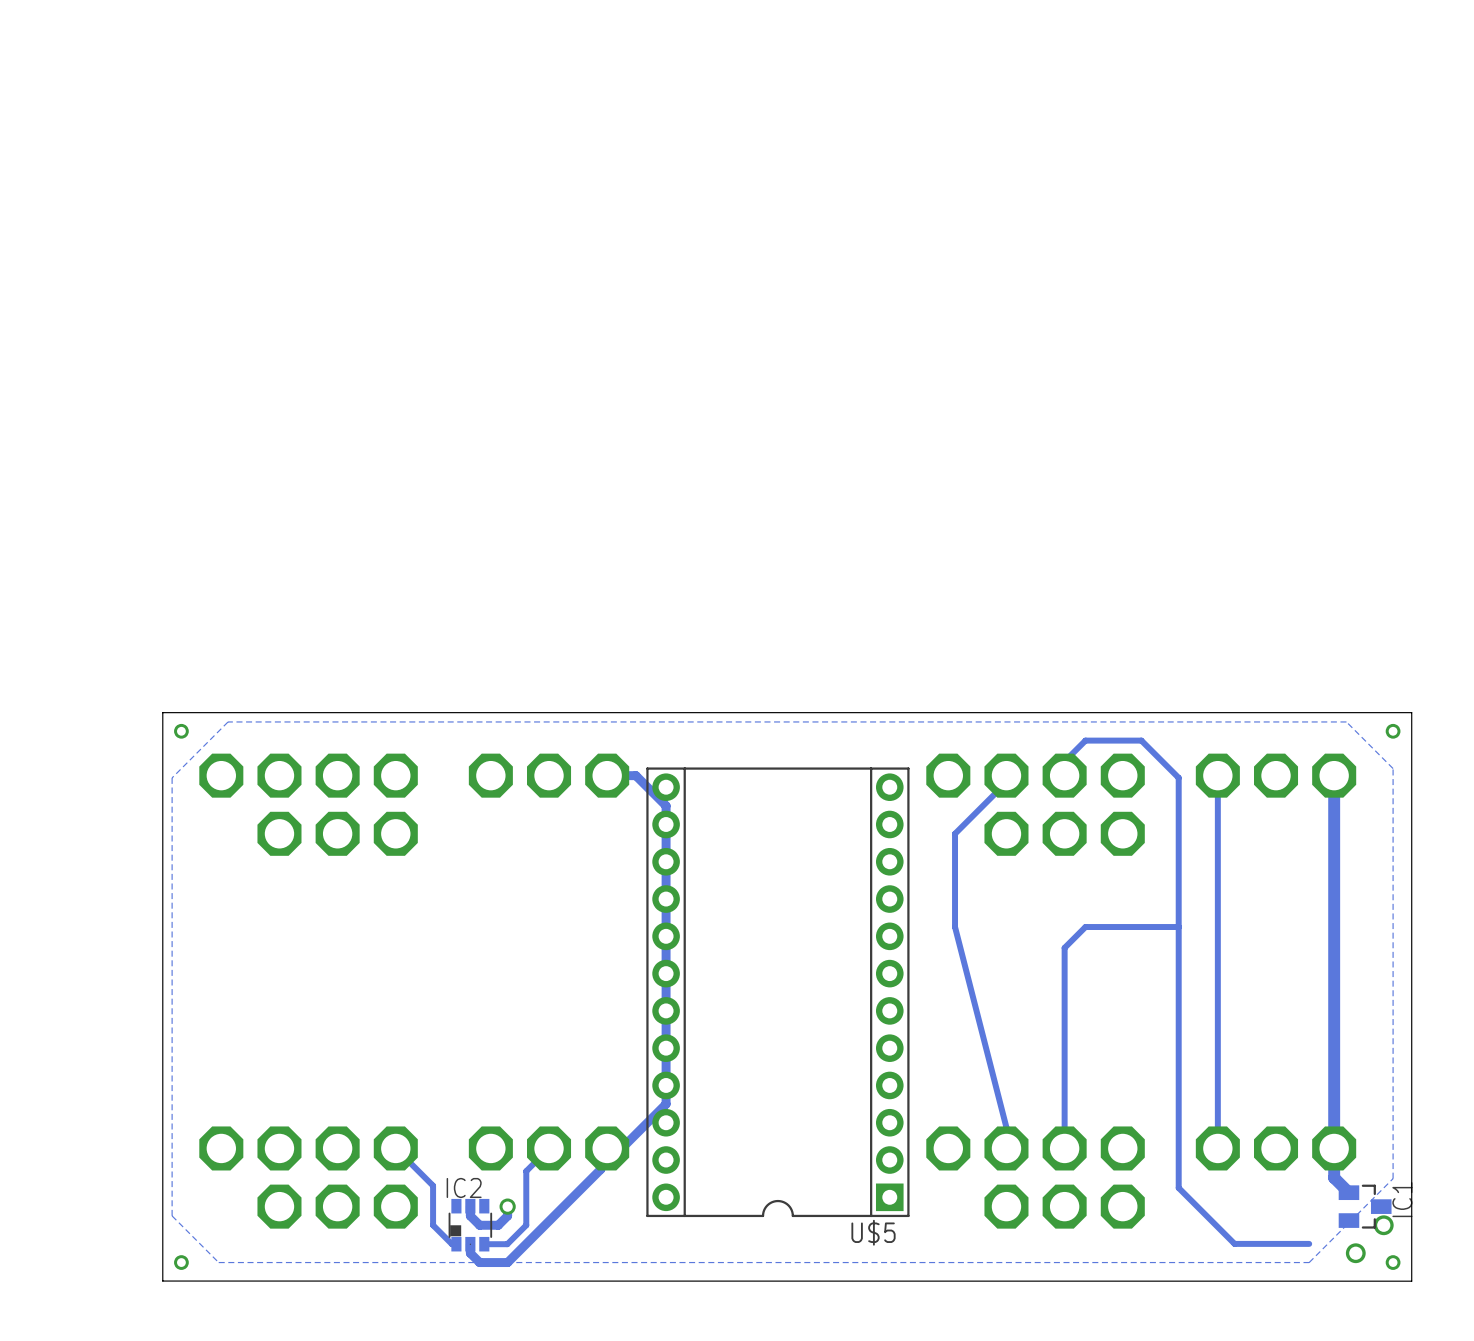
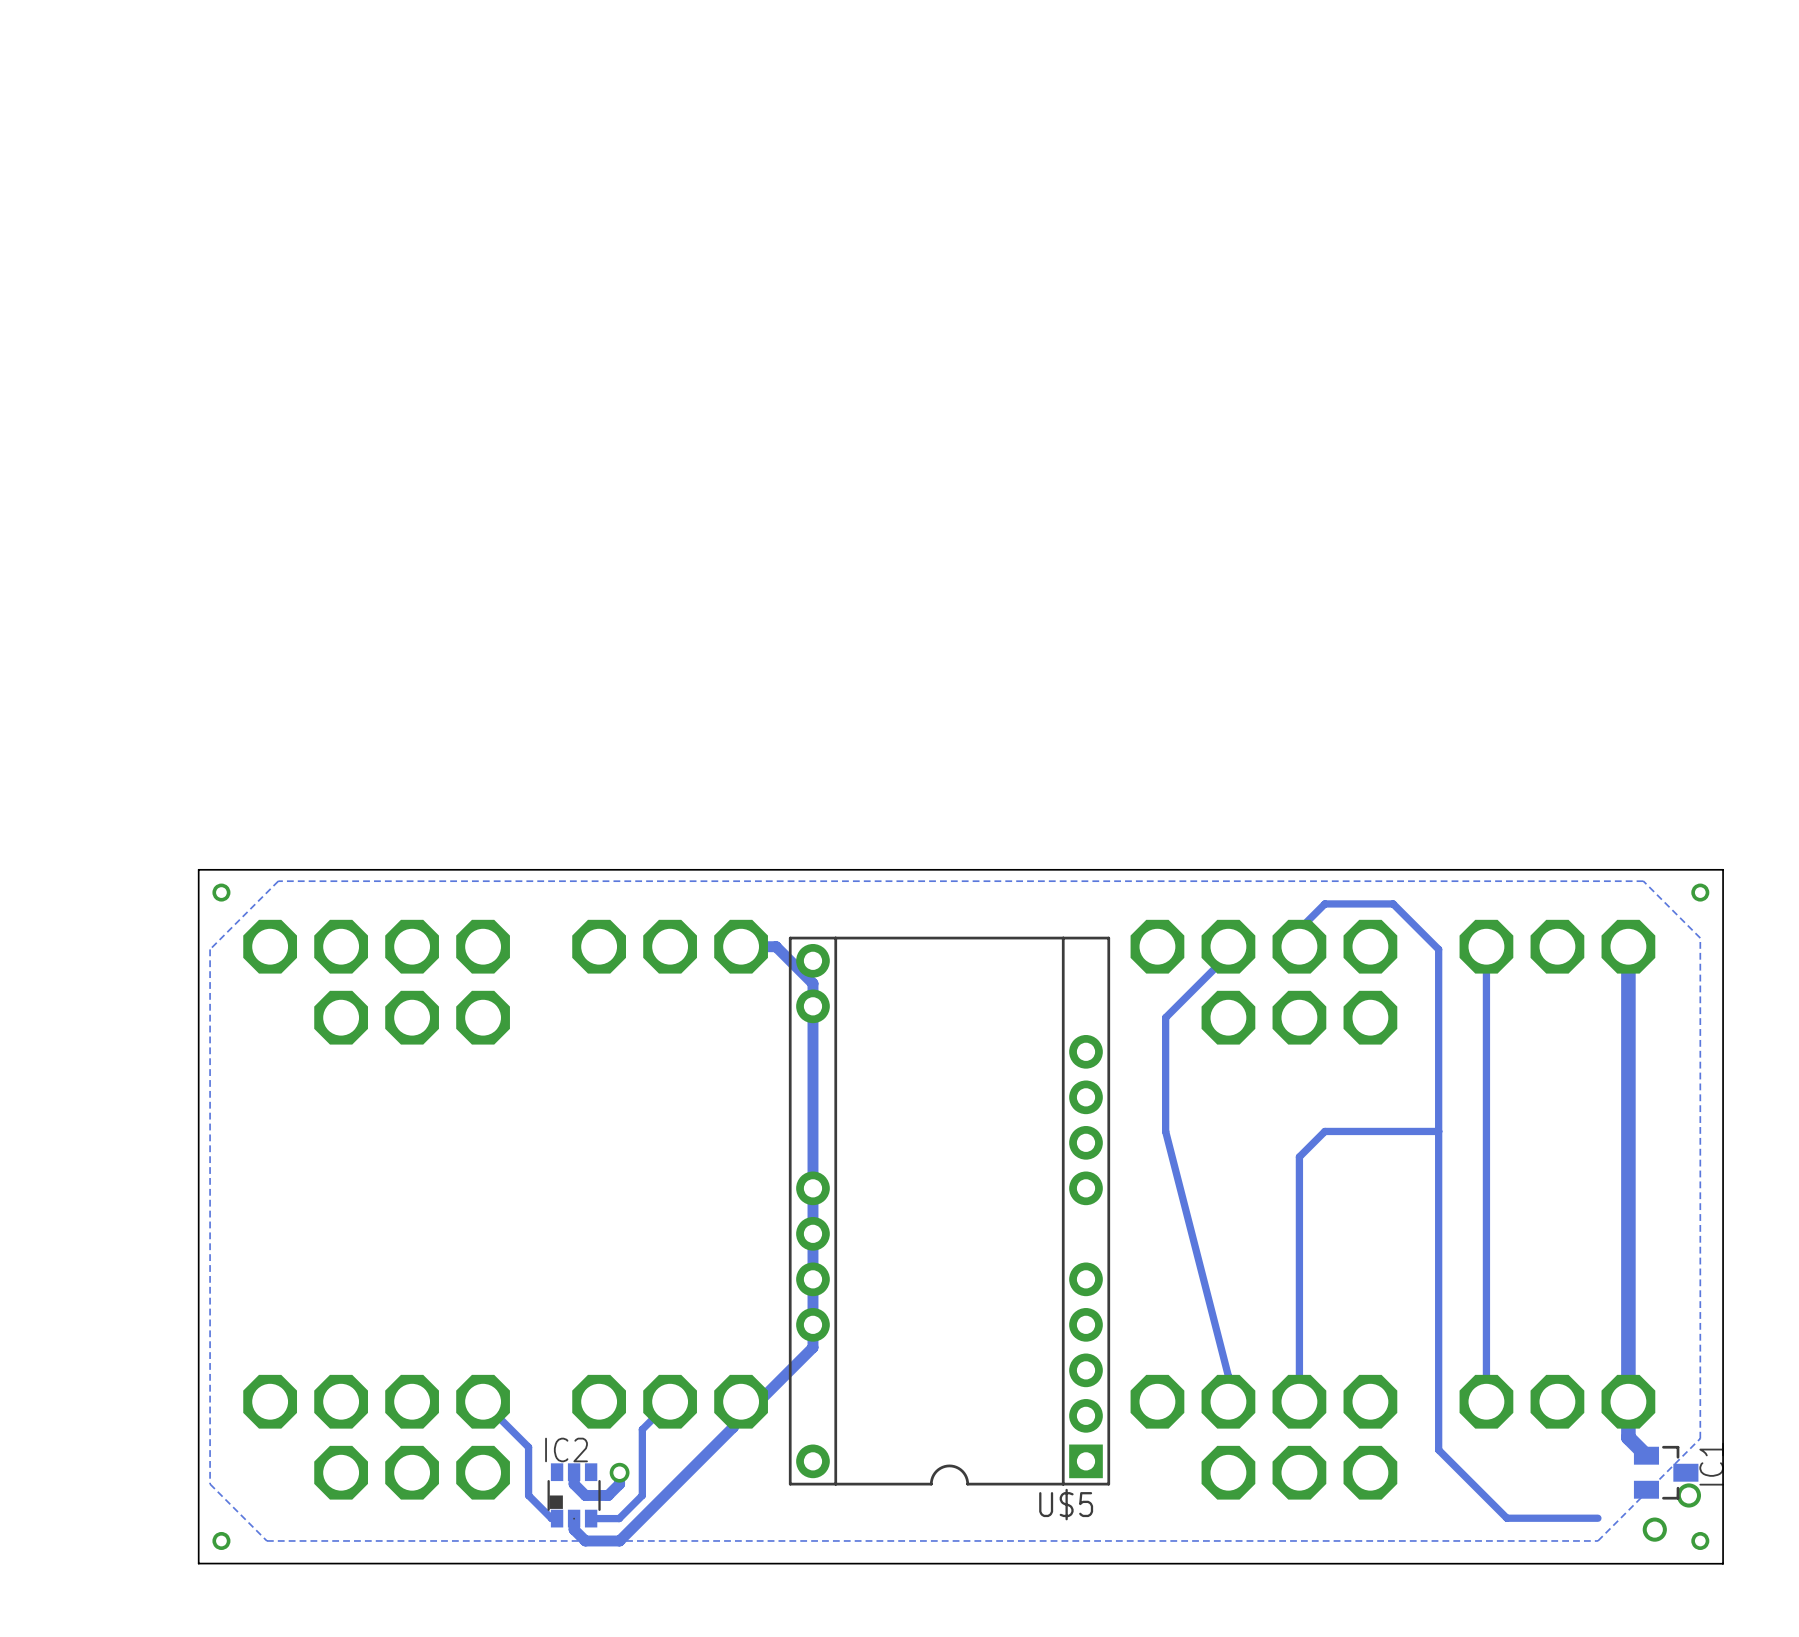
U$5 footprint: [646, 767, 910, 1218] -> [788, 936, 1111, 1486]

